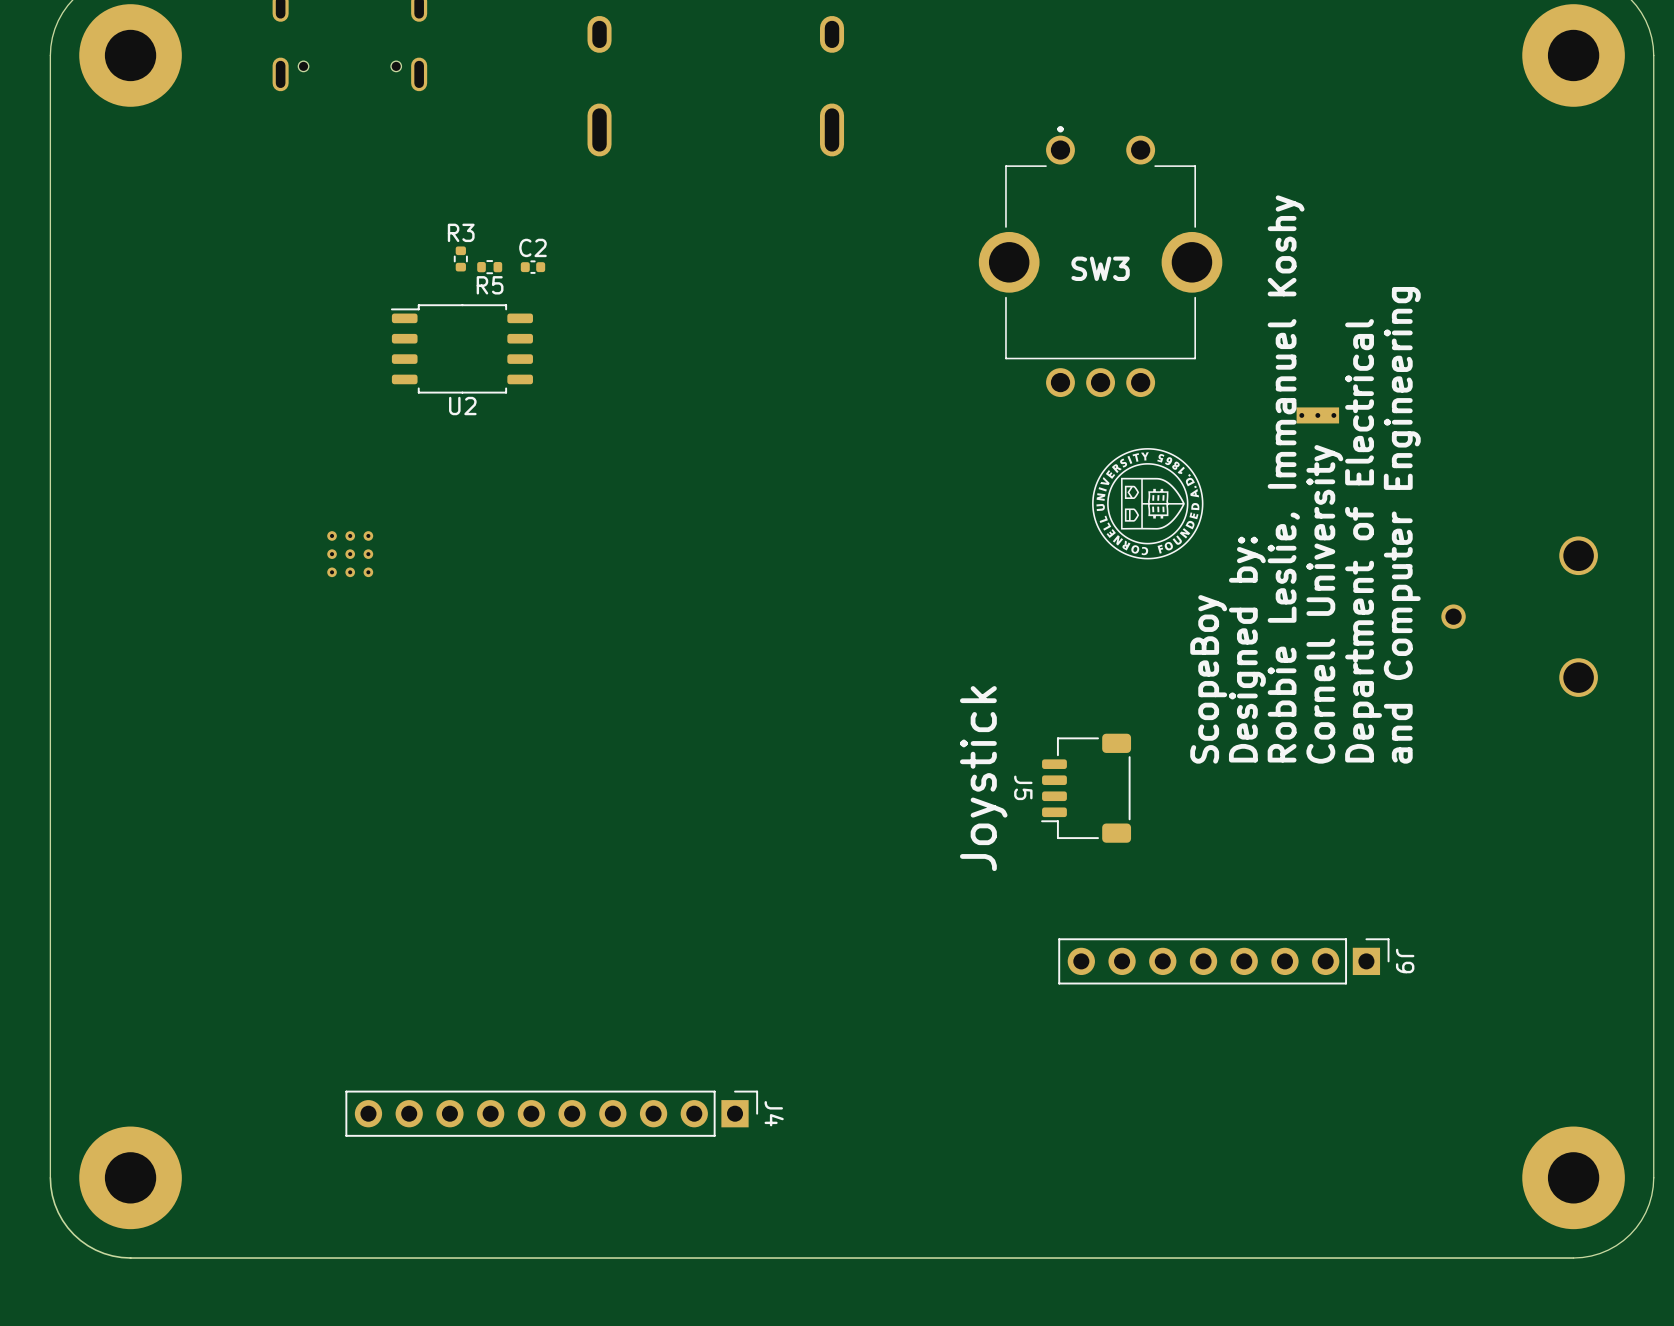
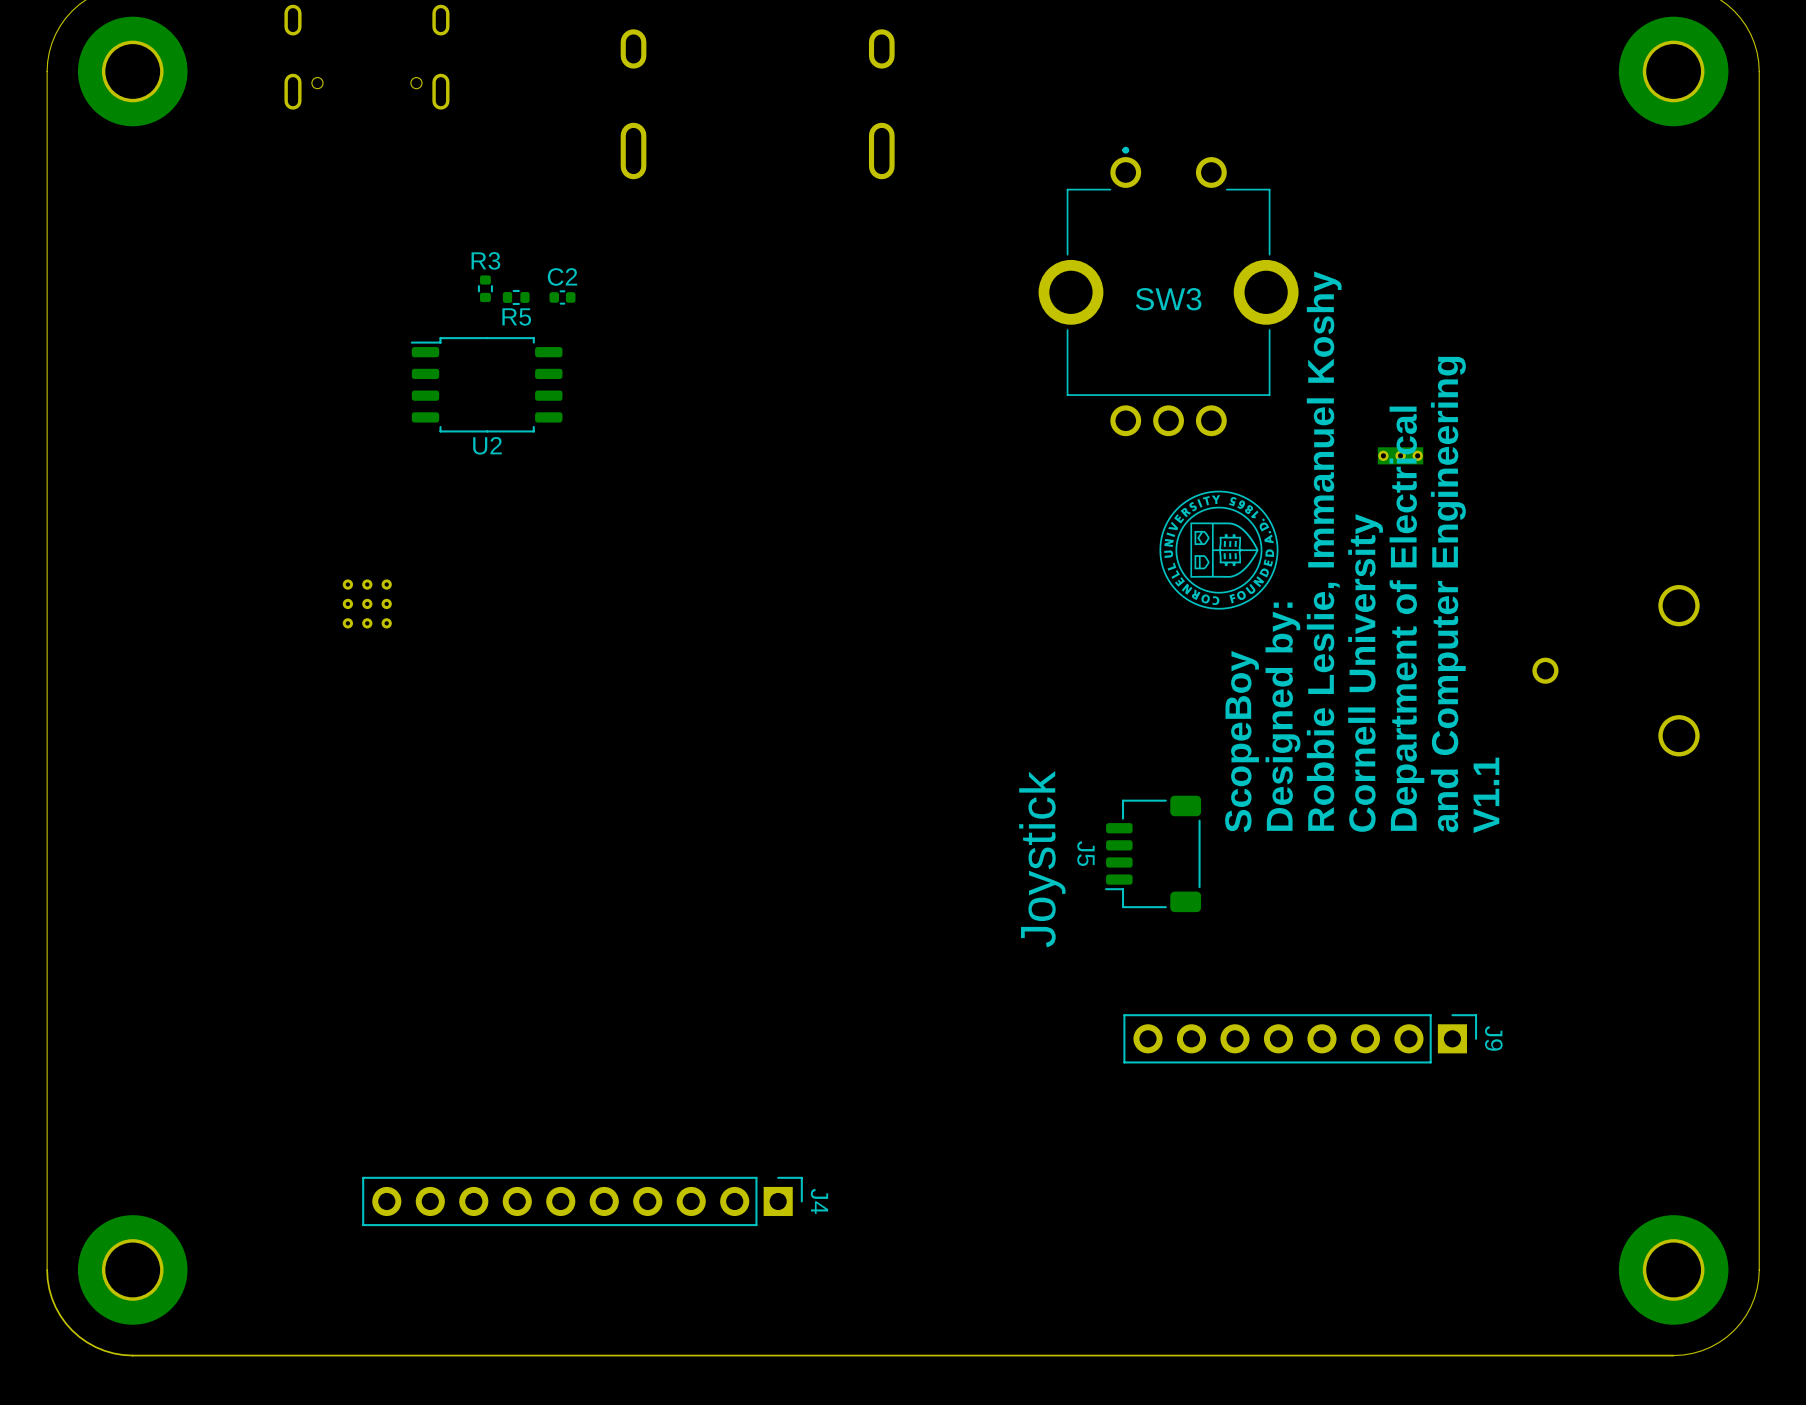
text: Robbie Leslie, Immanuel Koshy (1286, 478) -> Cornell University (1365, 672)
text: and Computer Engineering (1402, 525) -> V1.1 (1486, 795)
text: Department of Electrical (1363, 540) -> and Computer Engineering (1448, 594)
text: Cornell University (1324, 604) -> Department of Electrical (1406, 618)
text: Designed by: (1247, 649) -> Robbie Leslie, Immanuel Koshy (1324, 551)
text: none -> ScopeBoy (1242, 741)
text: ScopeBoy (1208, 679) -> Designed by: (1282, 716)

